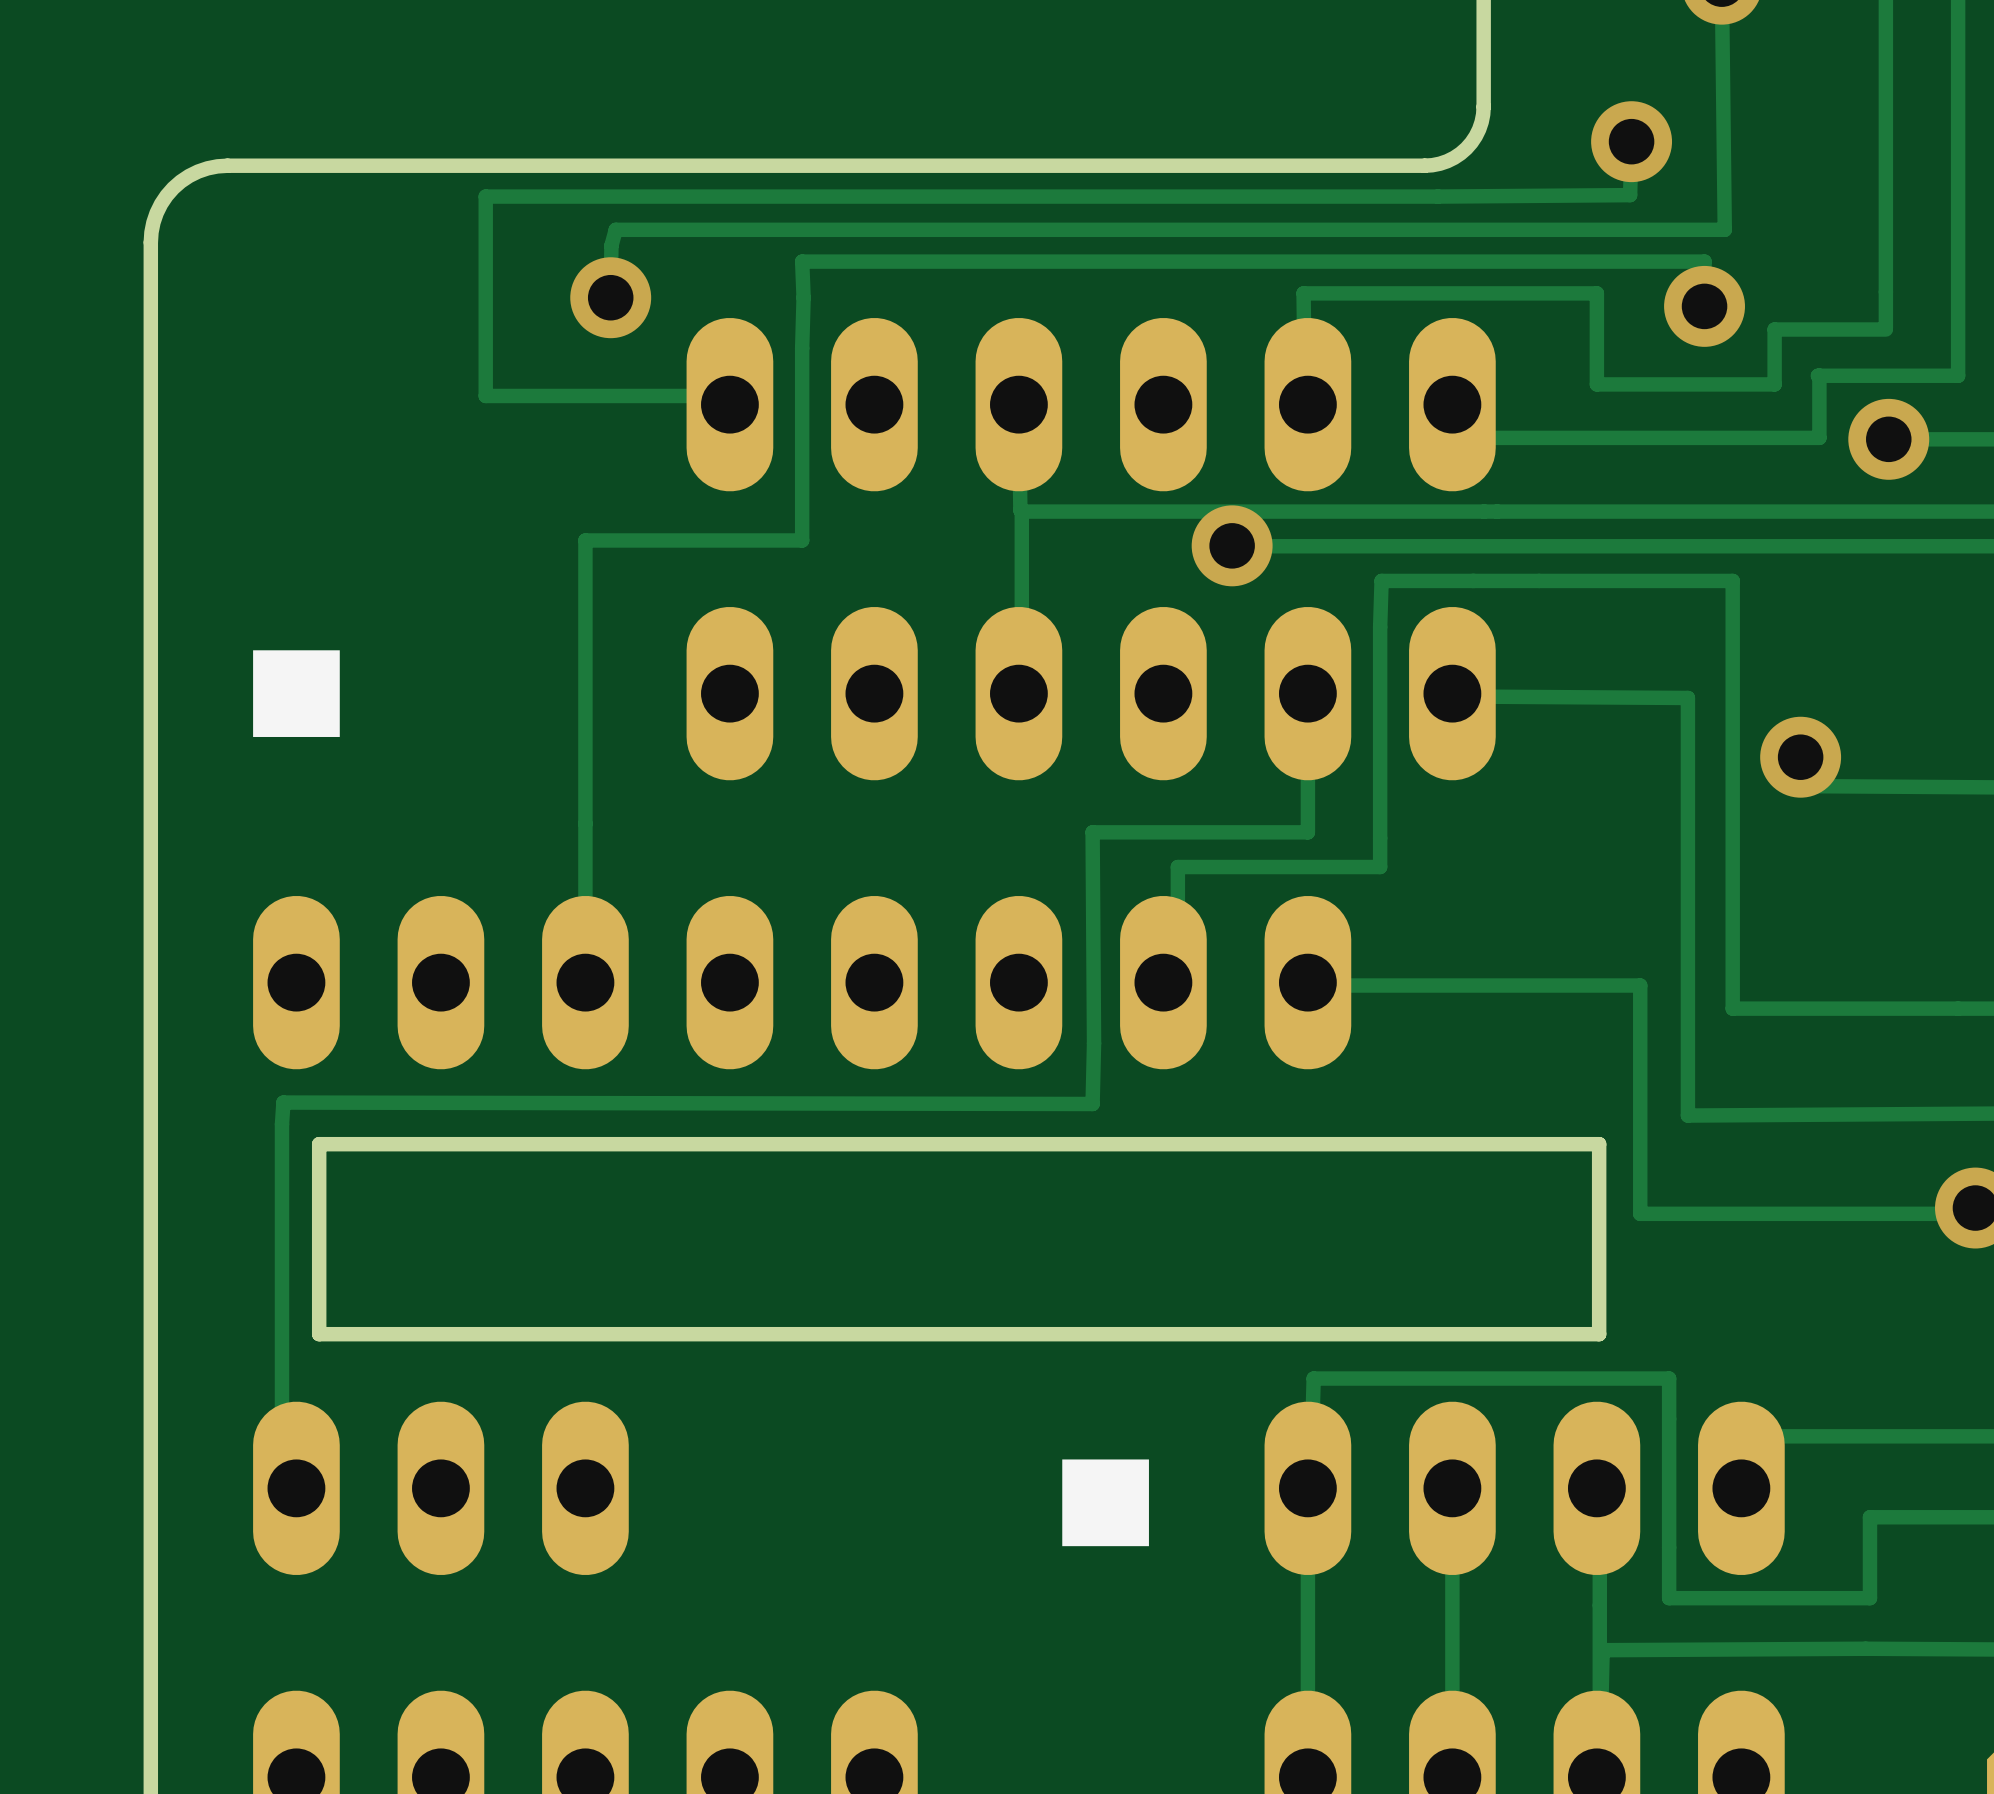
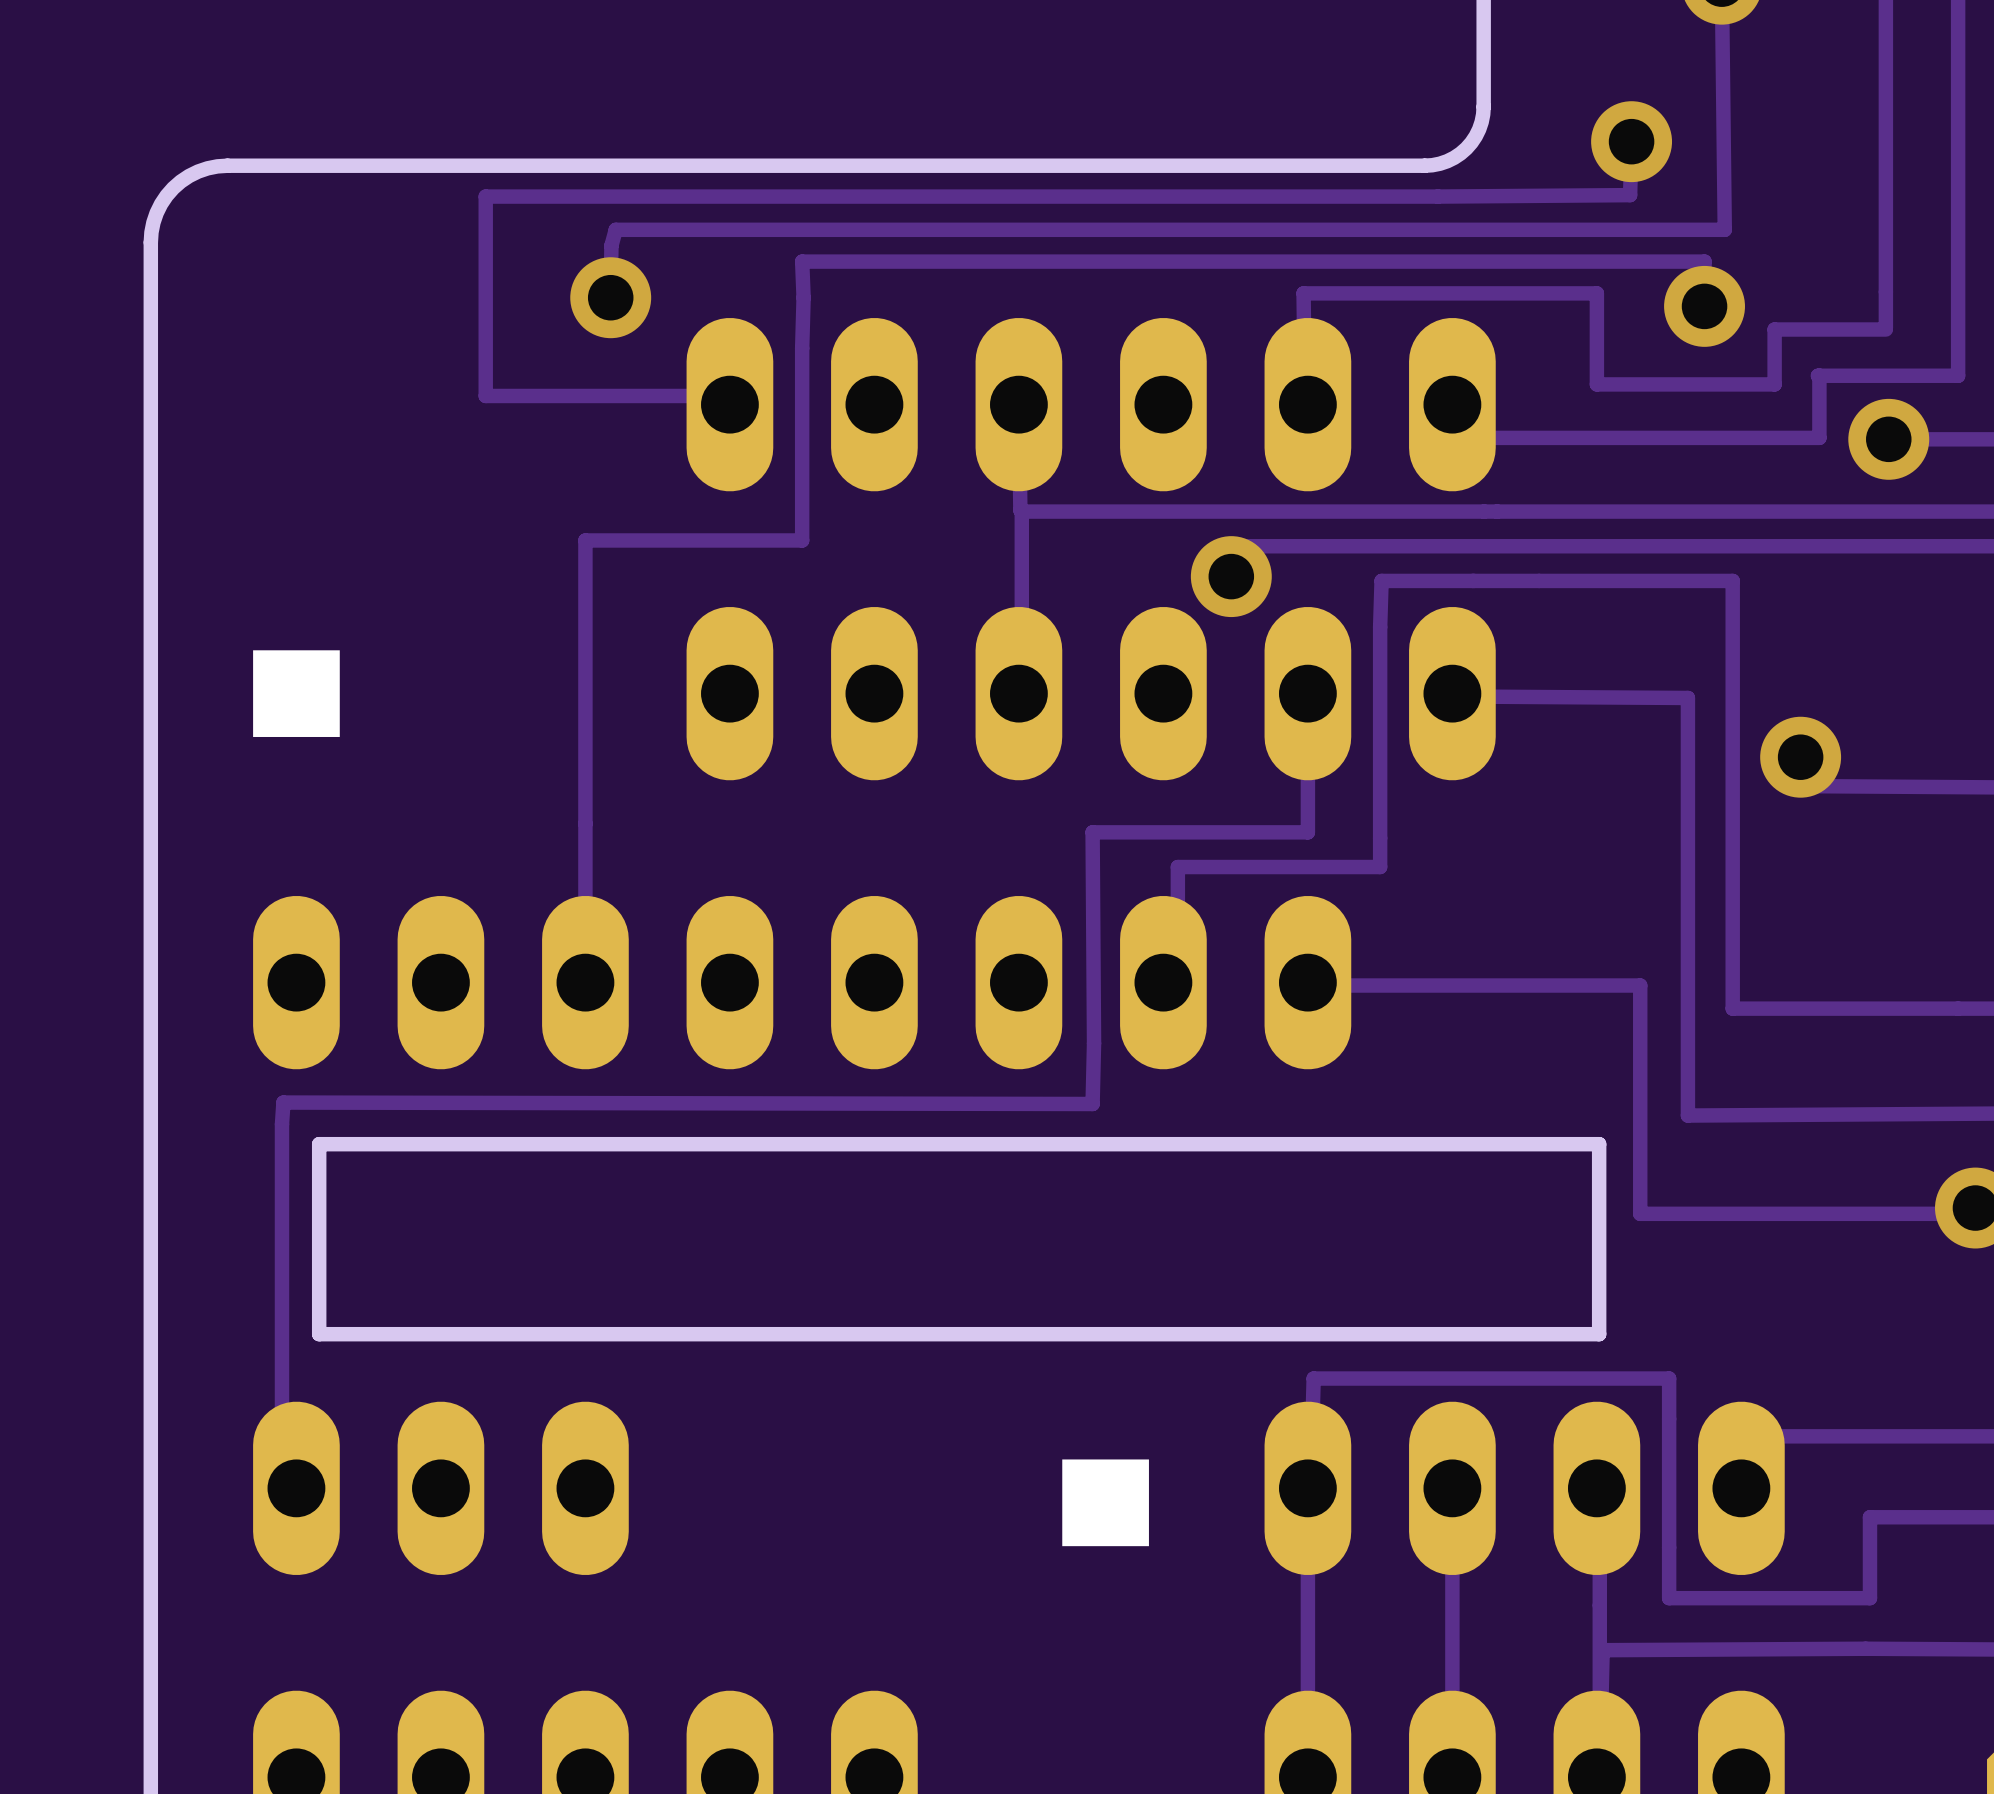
via position: (1232, 545) -> (1231, 576)

